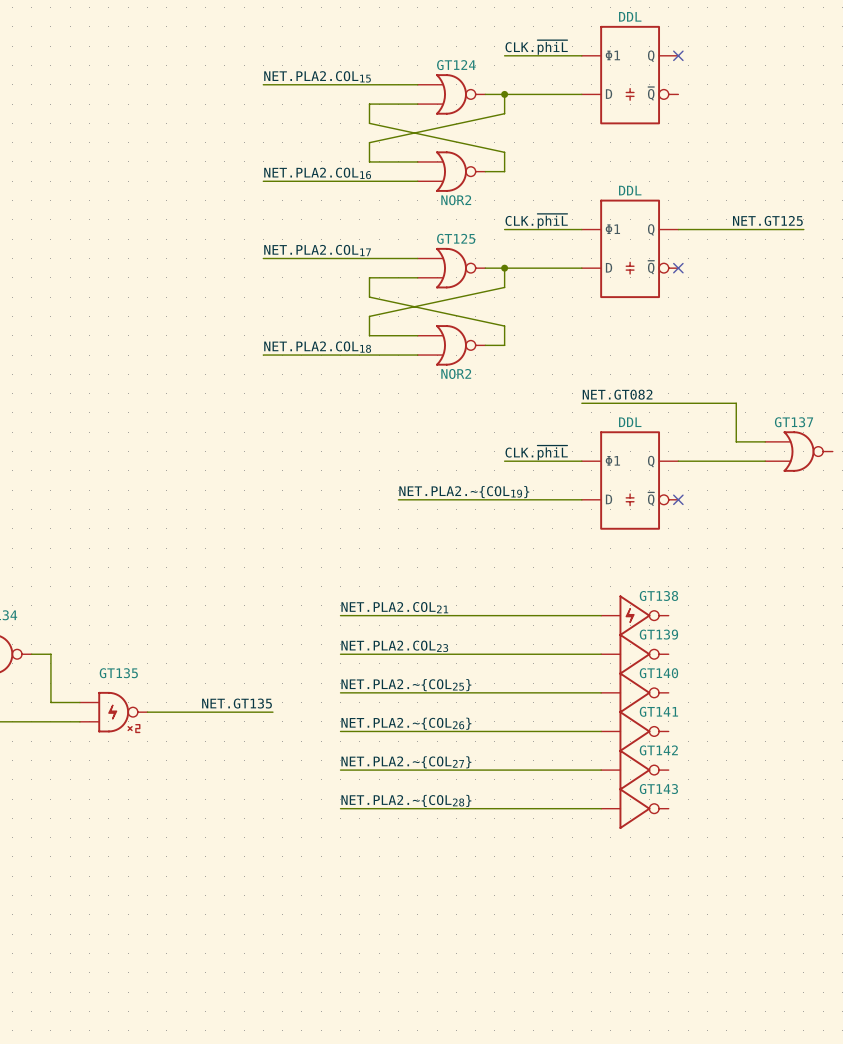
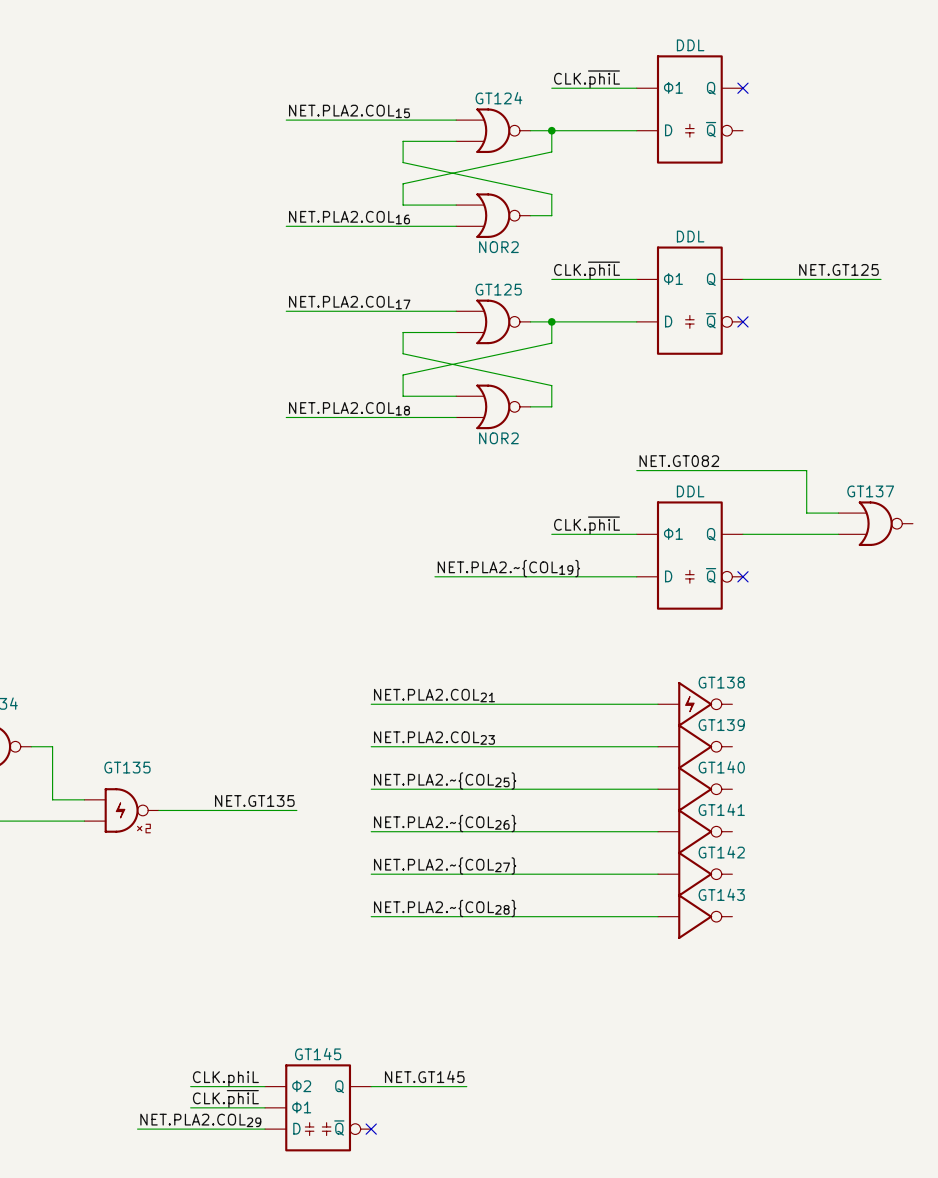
label: none -> NET.GT145 (424, 1076)
label: none -> CLK.phiL (225, 1078)
wire: none -> (190, 1086) (265, 1086)
wire: none -> (371, 1086) (466, 1086)
label: none -> CLK.~{phiL} (225, 1098)
wire: none -> (190, 1107) (265, 1107)
part: none -> GT145 (318, 1107)
label: none -> NET.PLA2.COL29 (200, 1120)
wire: none -> (137, 1129) (265, 1129)
no-connect mark: none -> (371, 1129)

